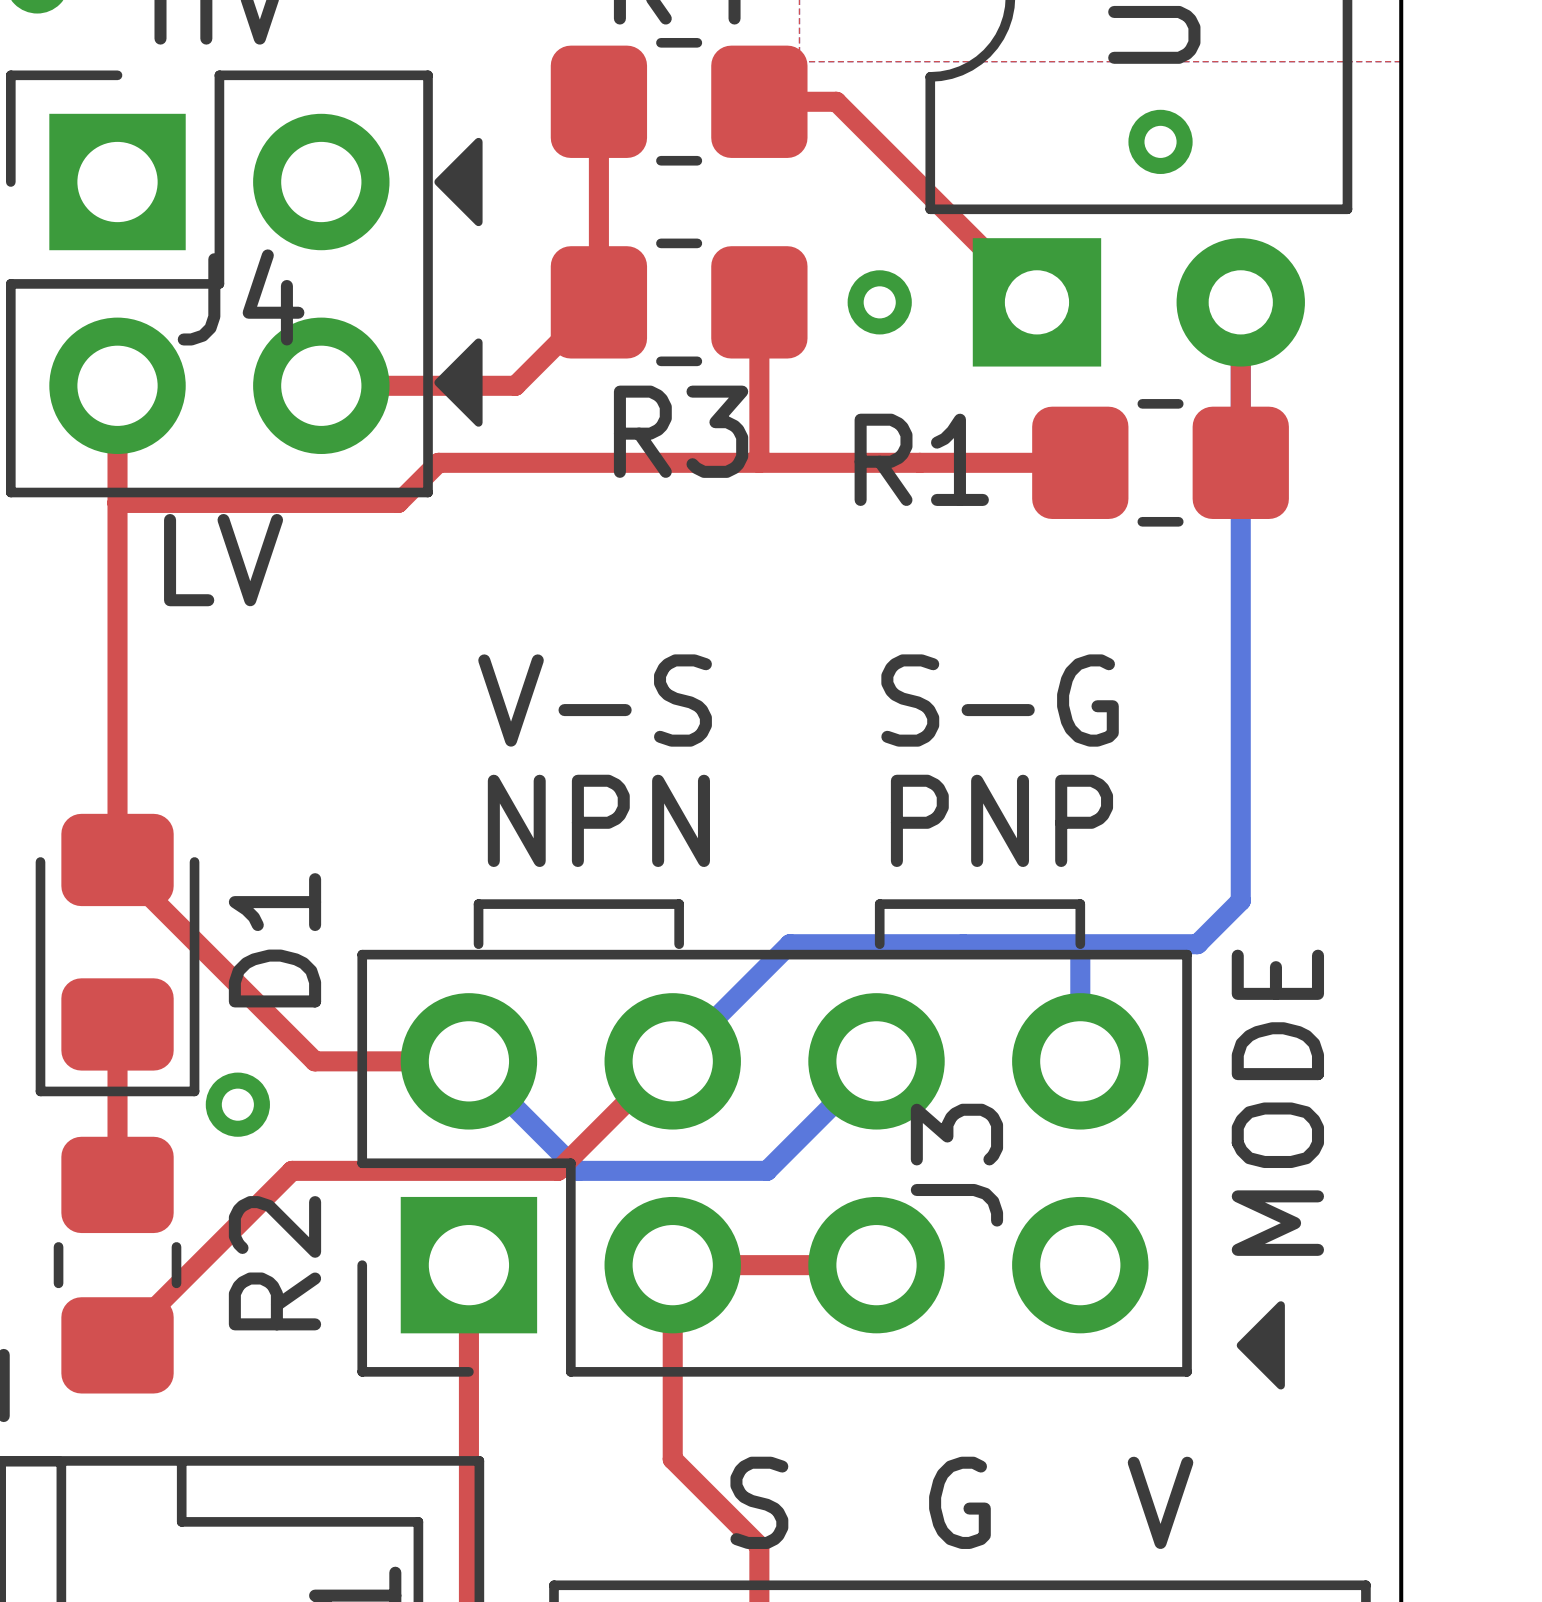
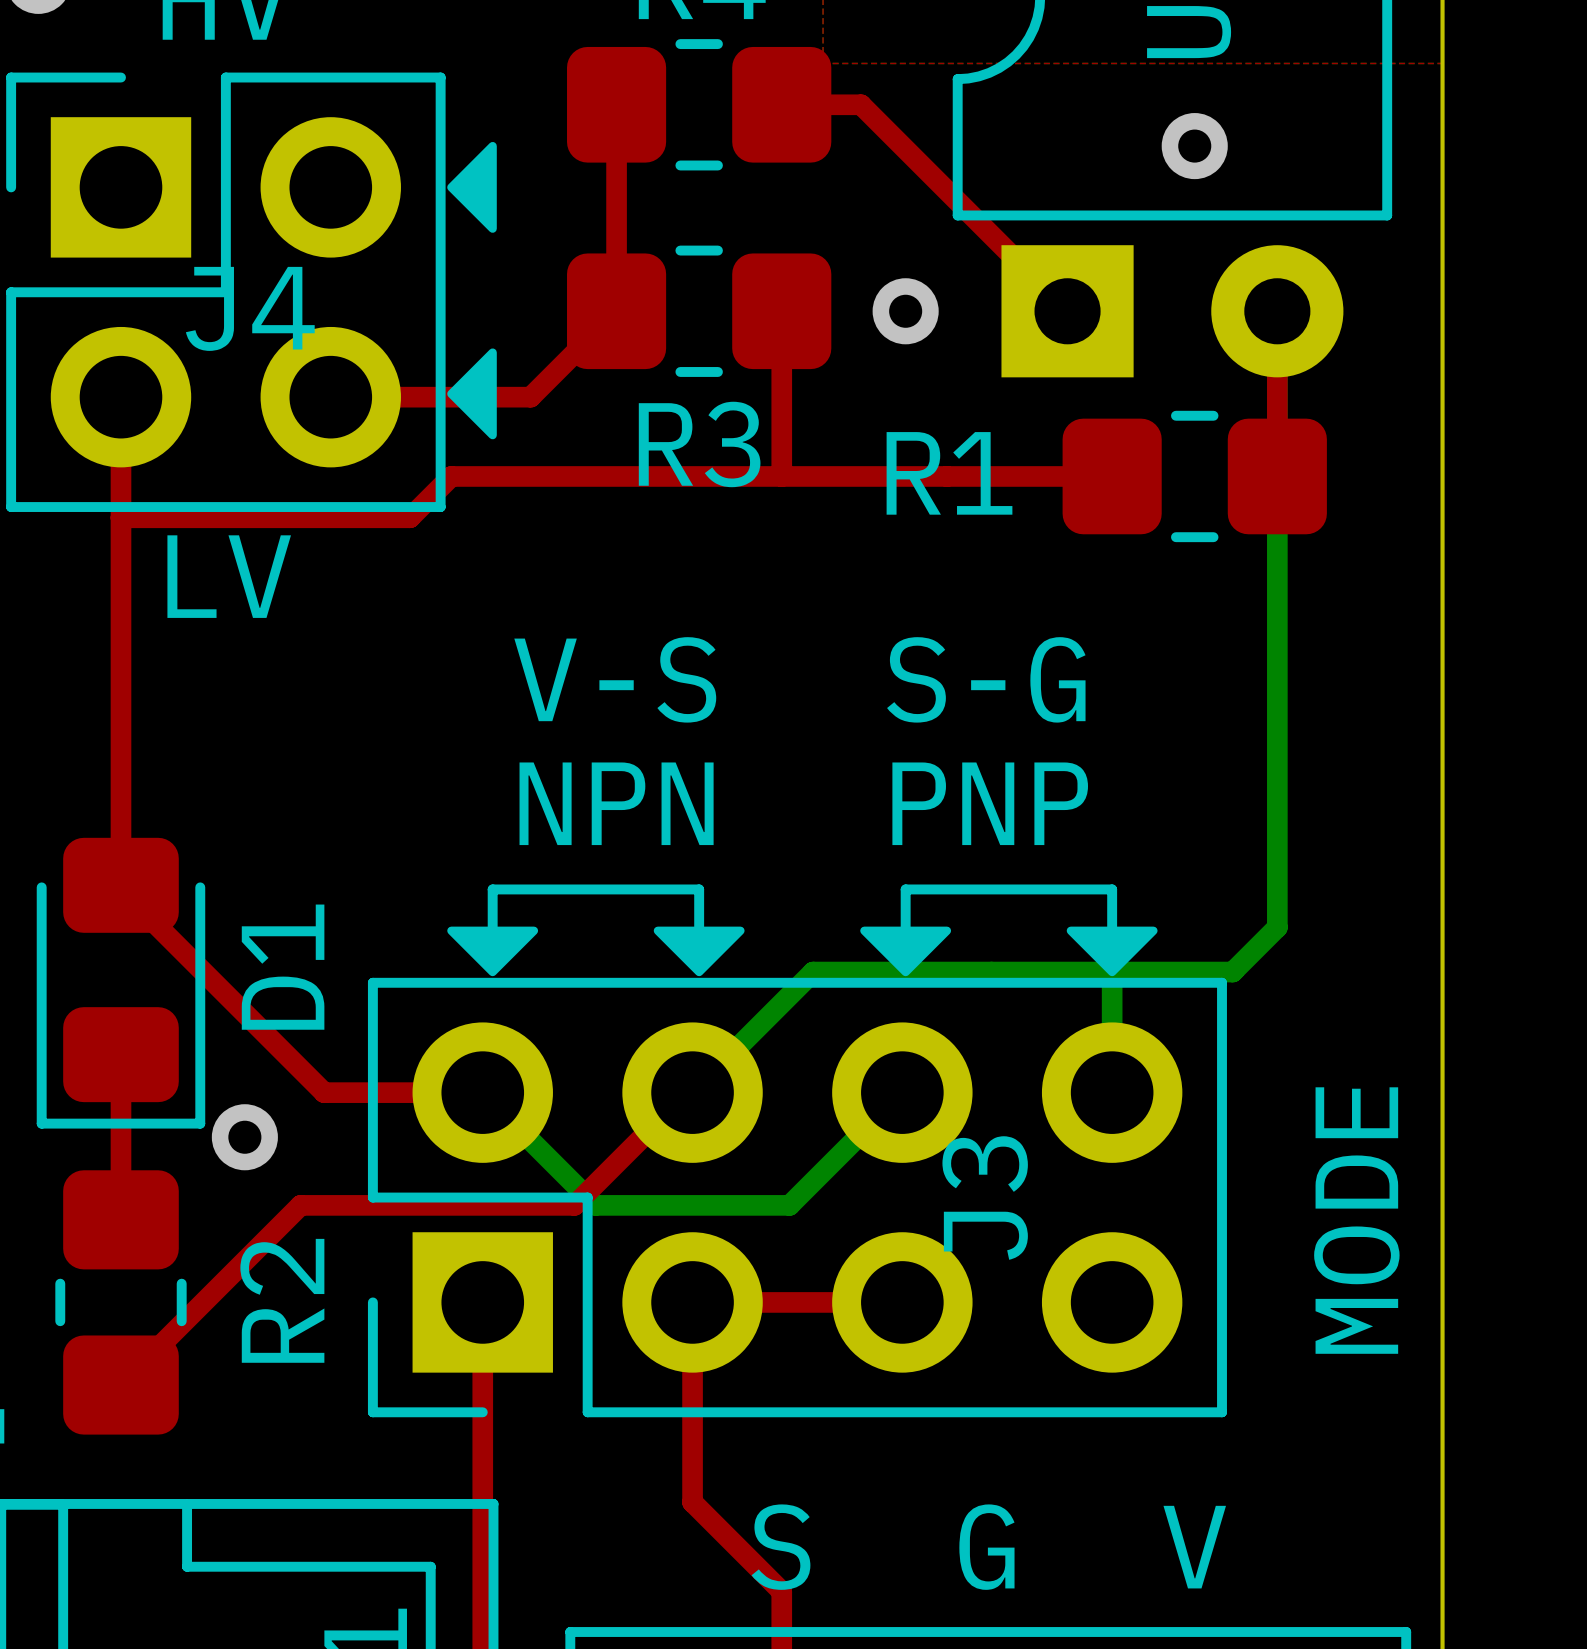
text position: V-S (595, 700) -> V-S (615, 679)
text position: S-G (1000, 700) -> S-G (986, 679)
text position: NPN (598, 820) -> NPN (616, 803)
text position: PNP (1001, 820) -> PNP (990, 803)
drawing: none -> [447, 926, 539, 977]
drawing: none -> [653, 926, 745, 977]
drawing: none -> [860, 926, 952, 977]
drawing: none -> [1066, 926, 1158, 977]
line: (478, 944) (478, 904) (679, 904) (679, 944) -> (492, 930) (492, 889) (699, 889) (699, 930)
line: (879, 944) (879, 904) (1080, 904) (1080, 944) -> (905, 930) (905, 889) (1112, 889) (1112, 930)
text position: MODE (1277, 1102) -> MODE (1356, 1220)
drawing: [1236, 1301, 1285, 1390] -> none

